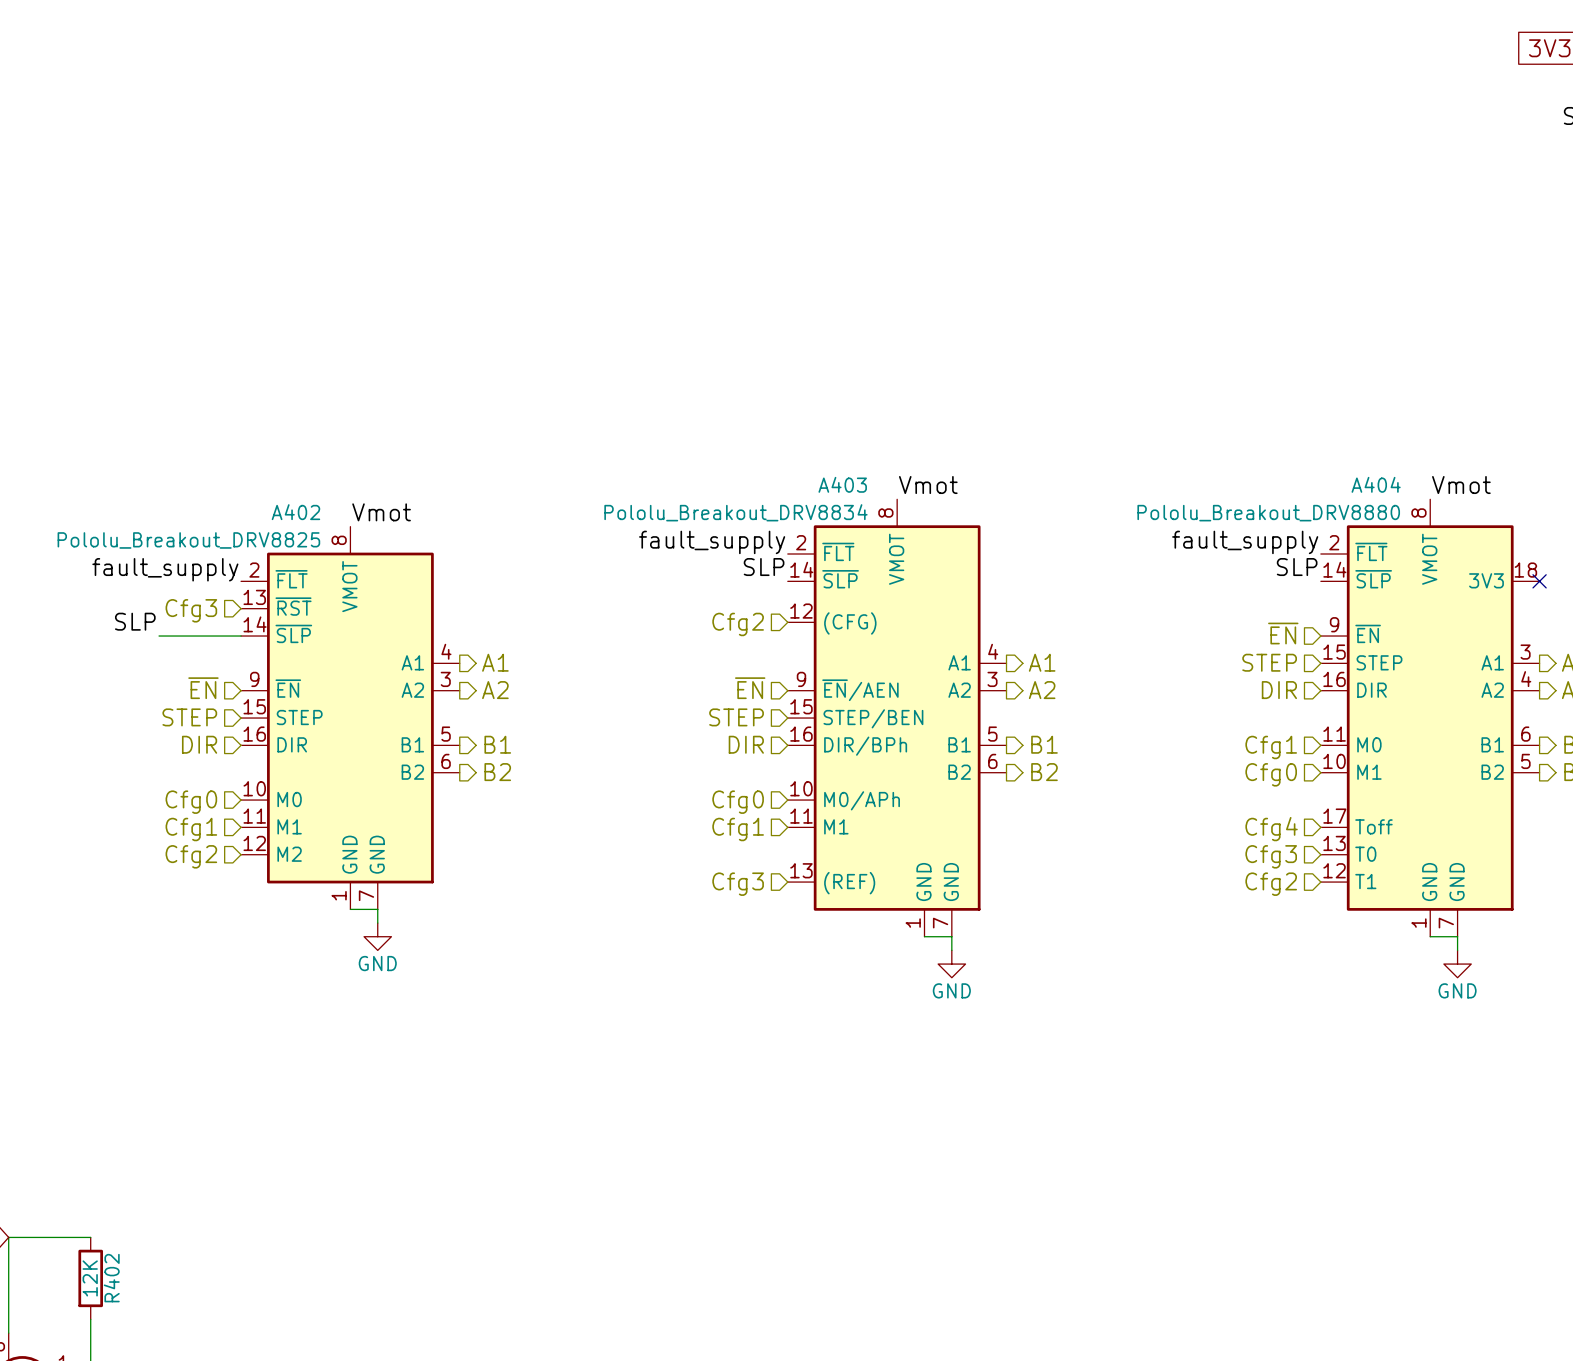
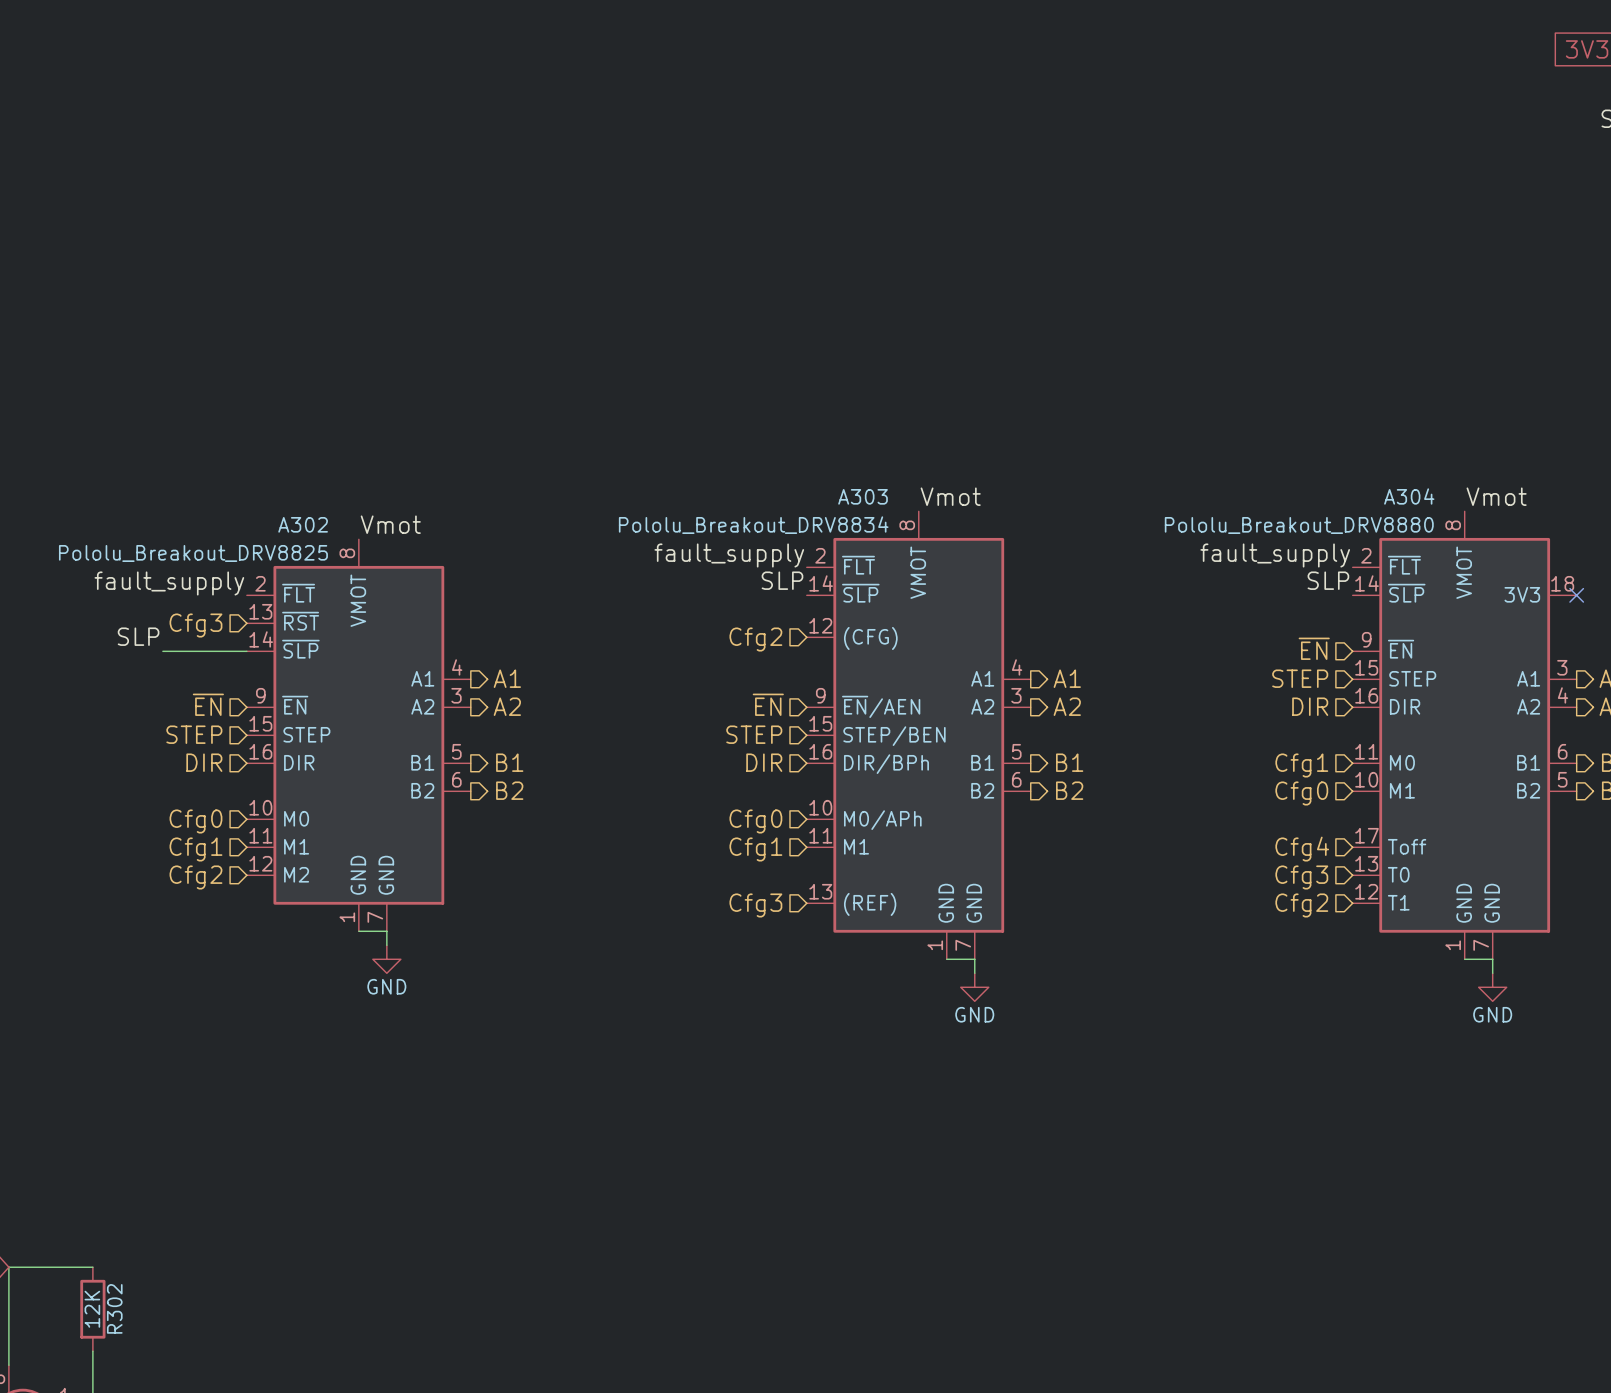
A403 name: A403 (842, 484) -> A303 (863, 496)
A404 name: A404 (1376, 484) -> A304 (1409, 496)
A402 name: A402 (295, 512) -> A302 (303, 524)
R402 name: R402 (111, 1278) -> R302 (114, 1308)

